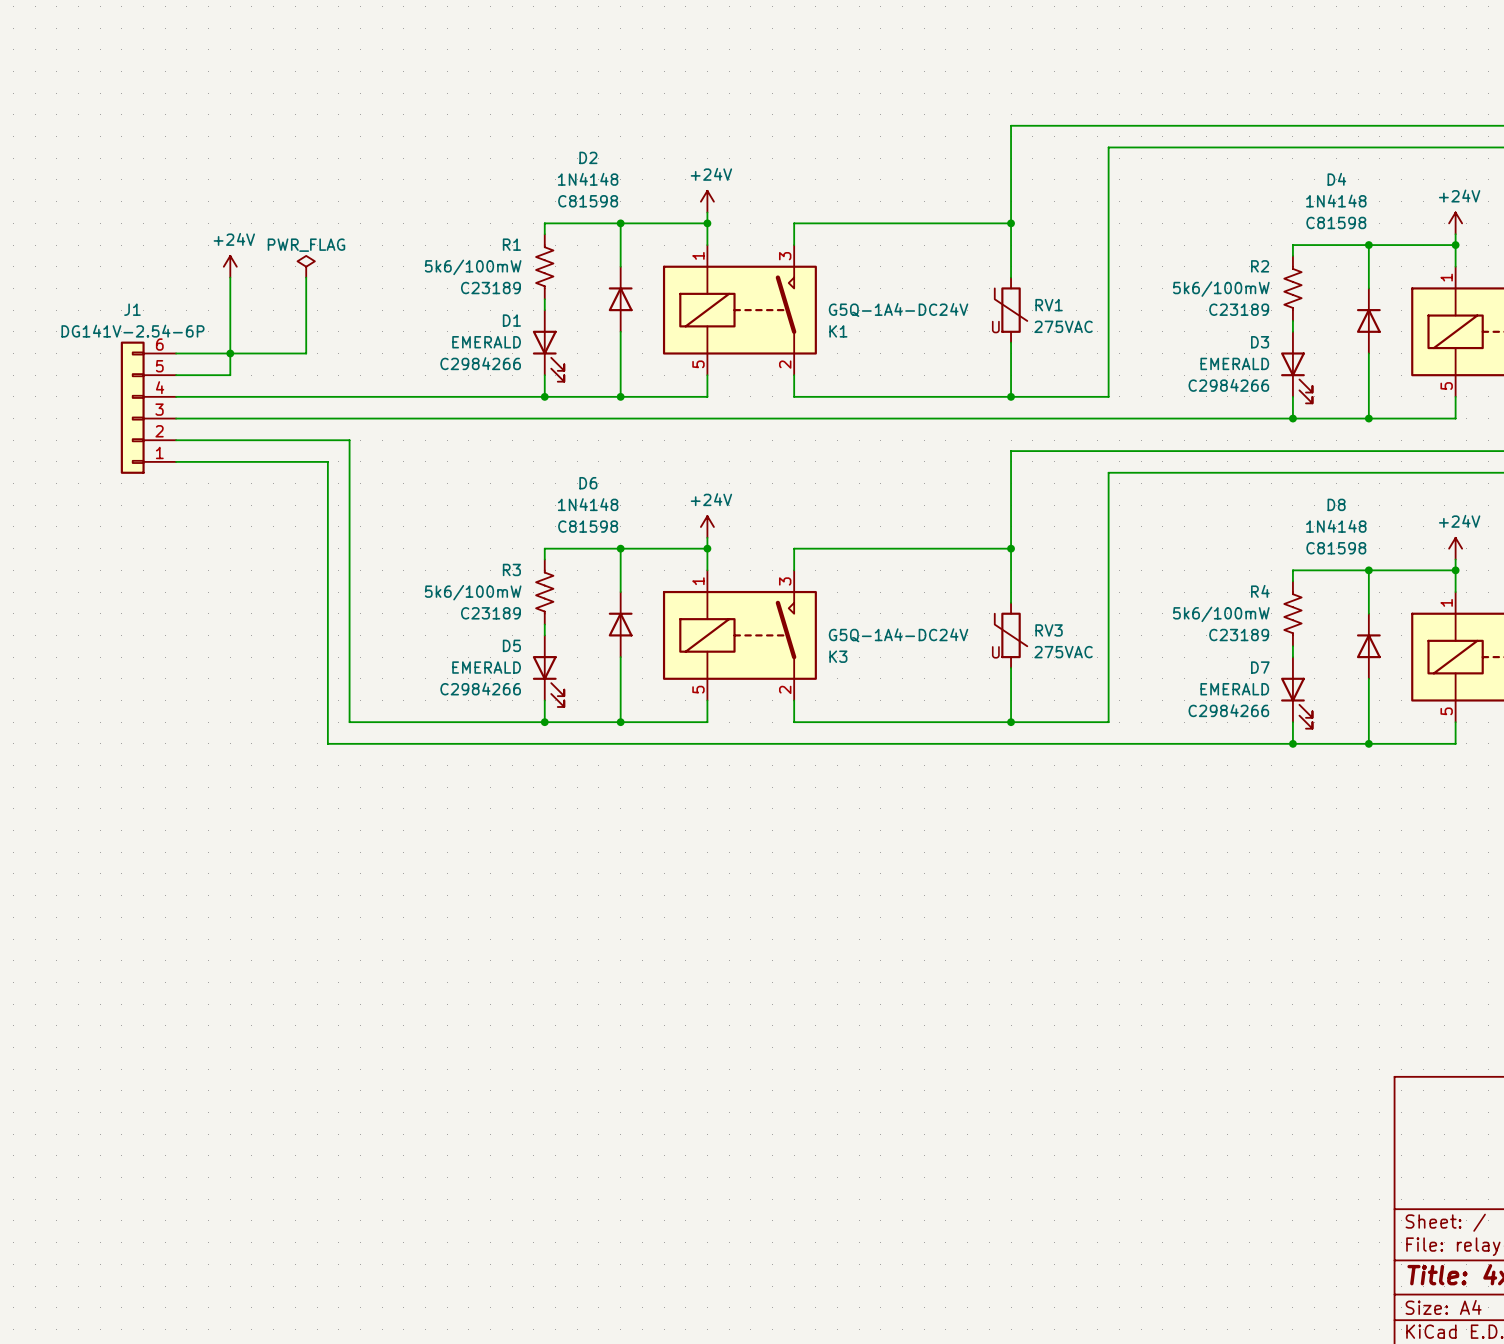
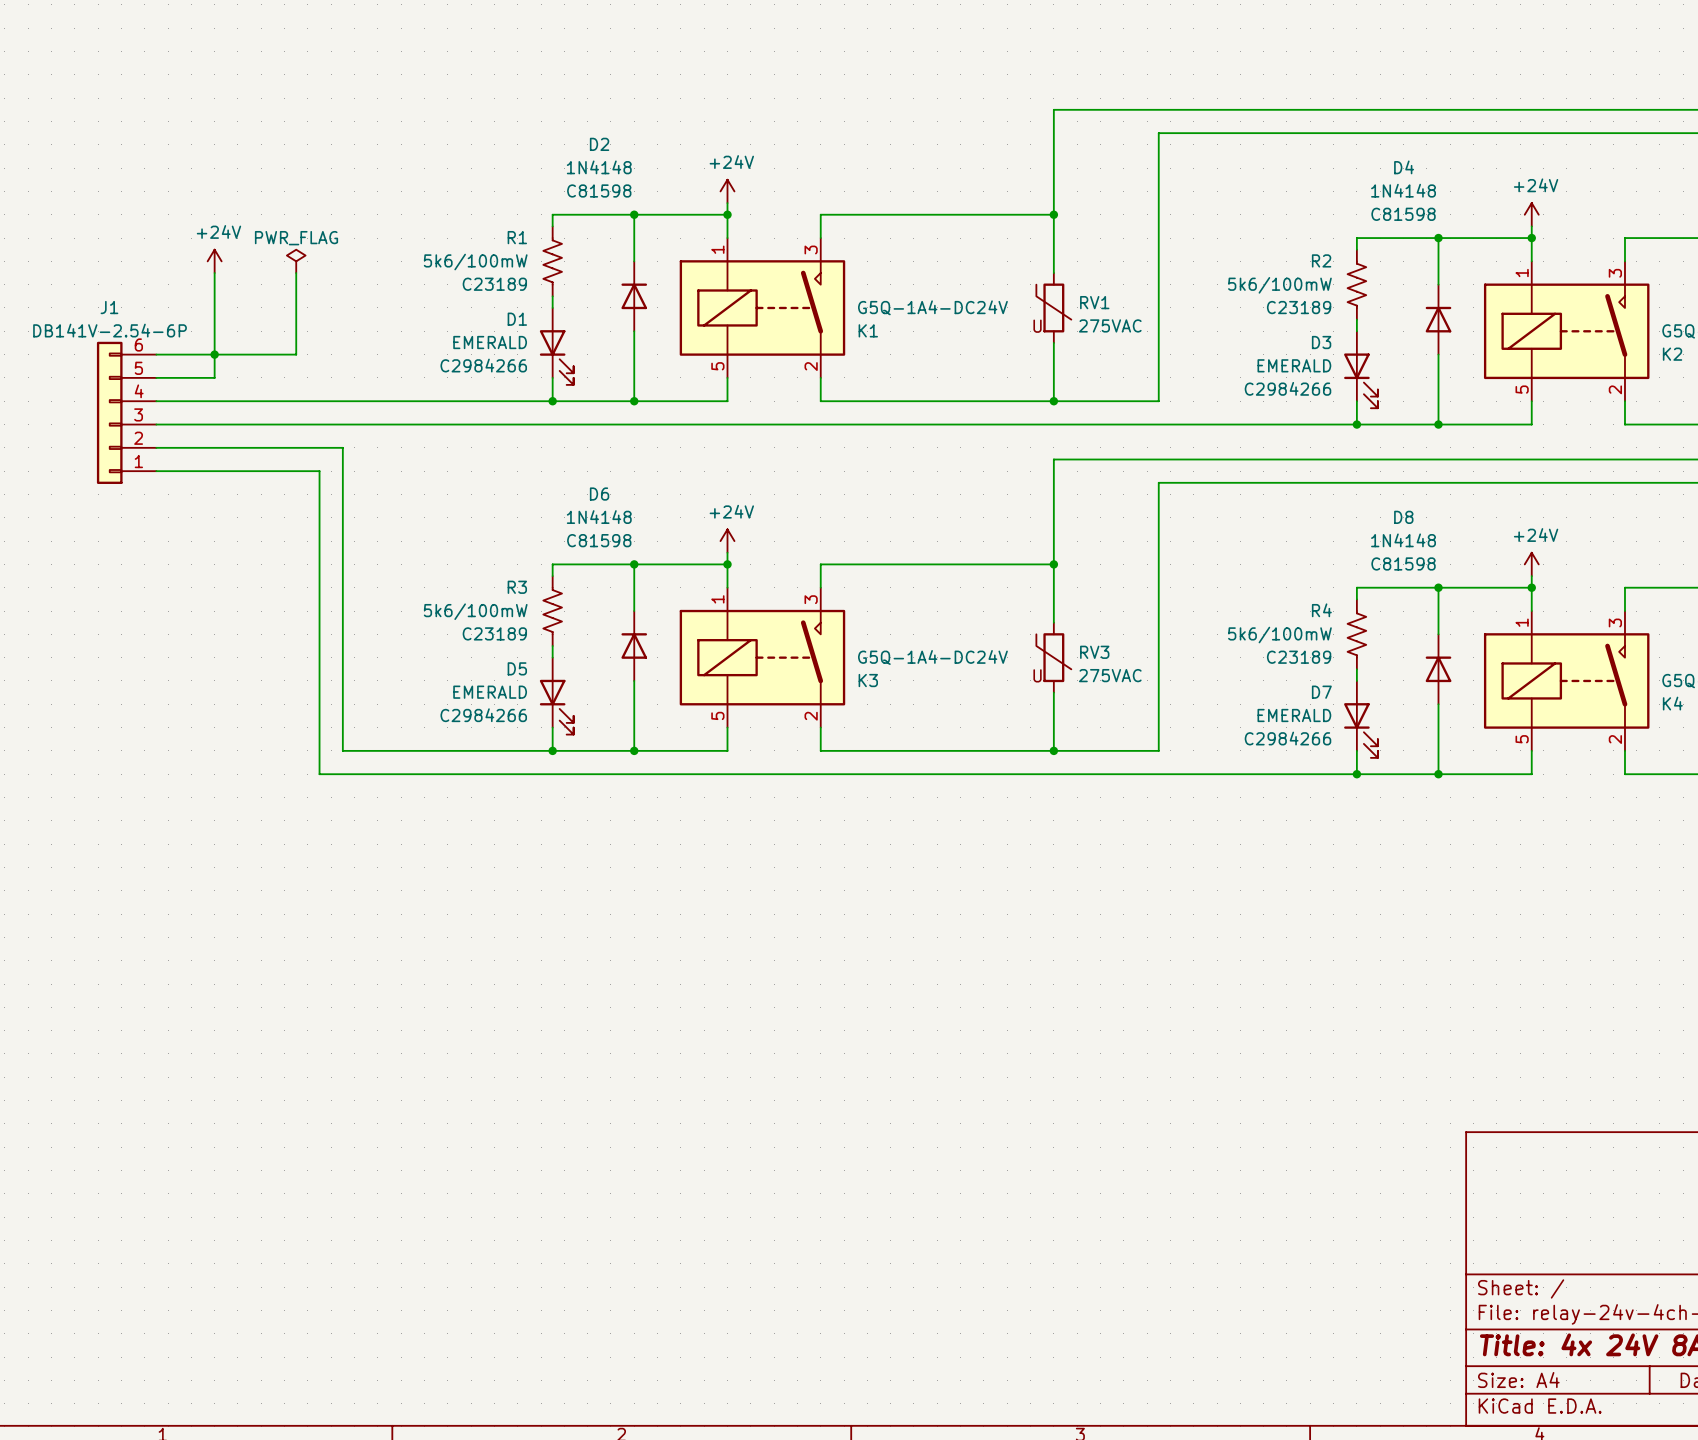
J1 value: DG141V-2.54-6P (132, 331) -> DB141V-2.54-6P (110, 330)

